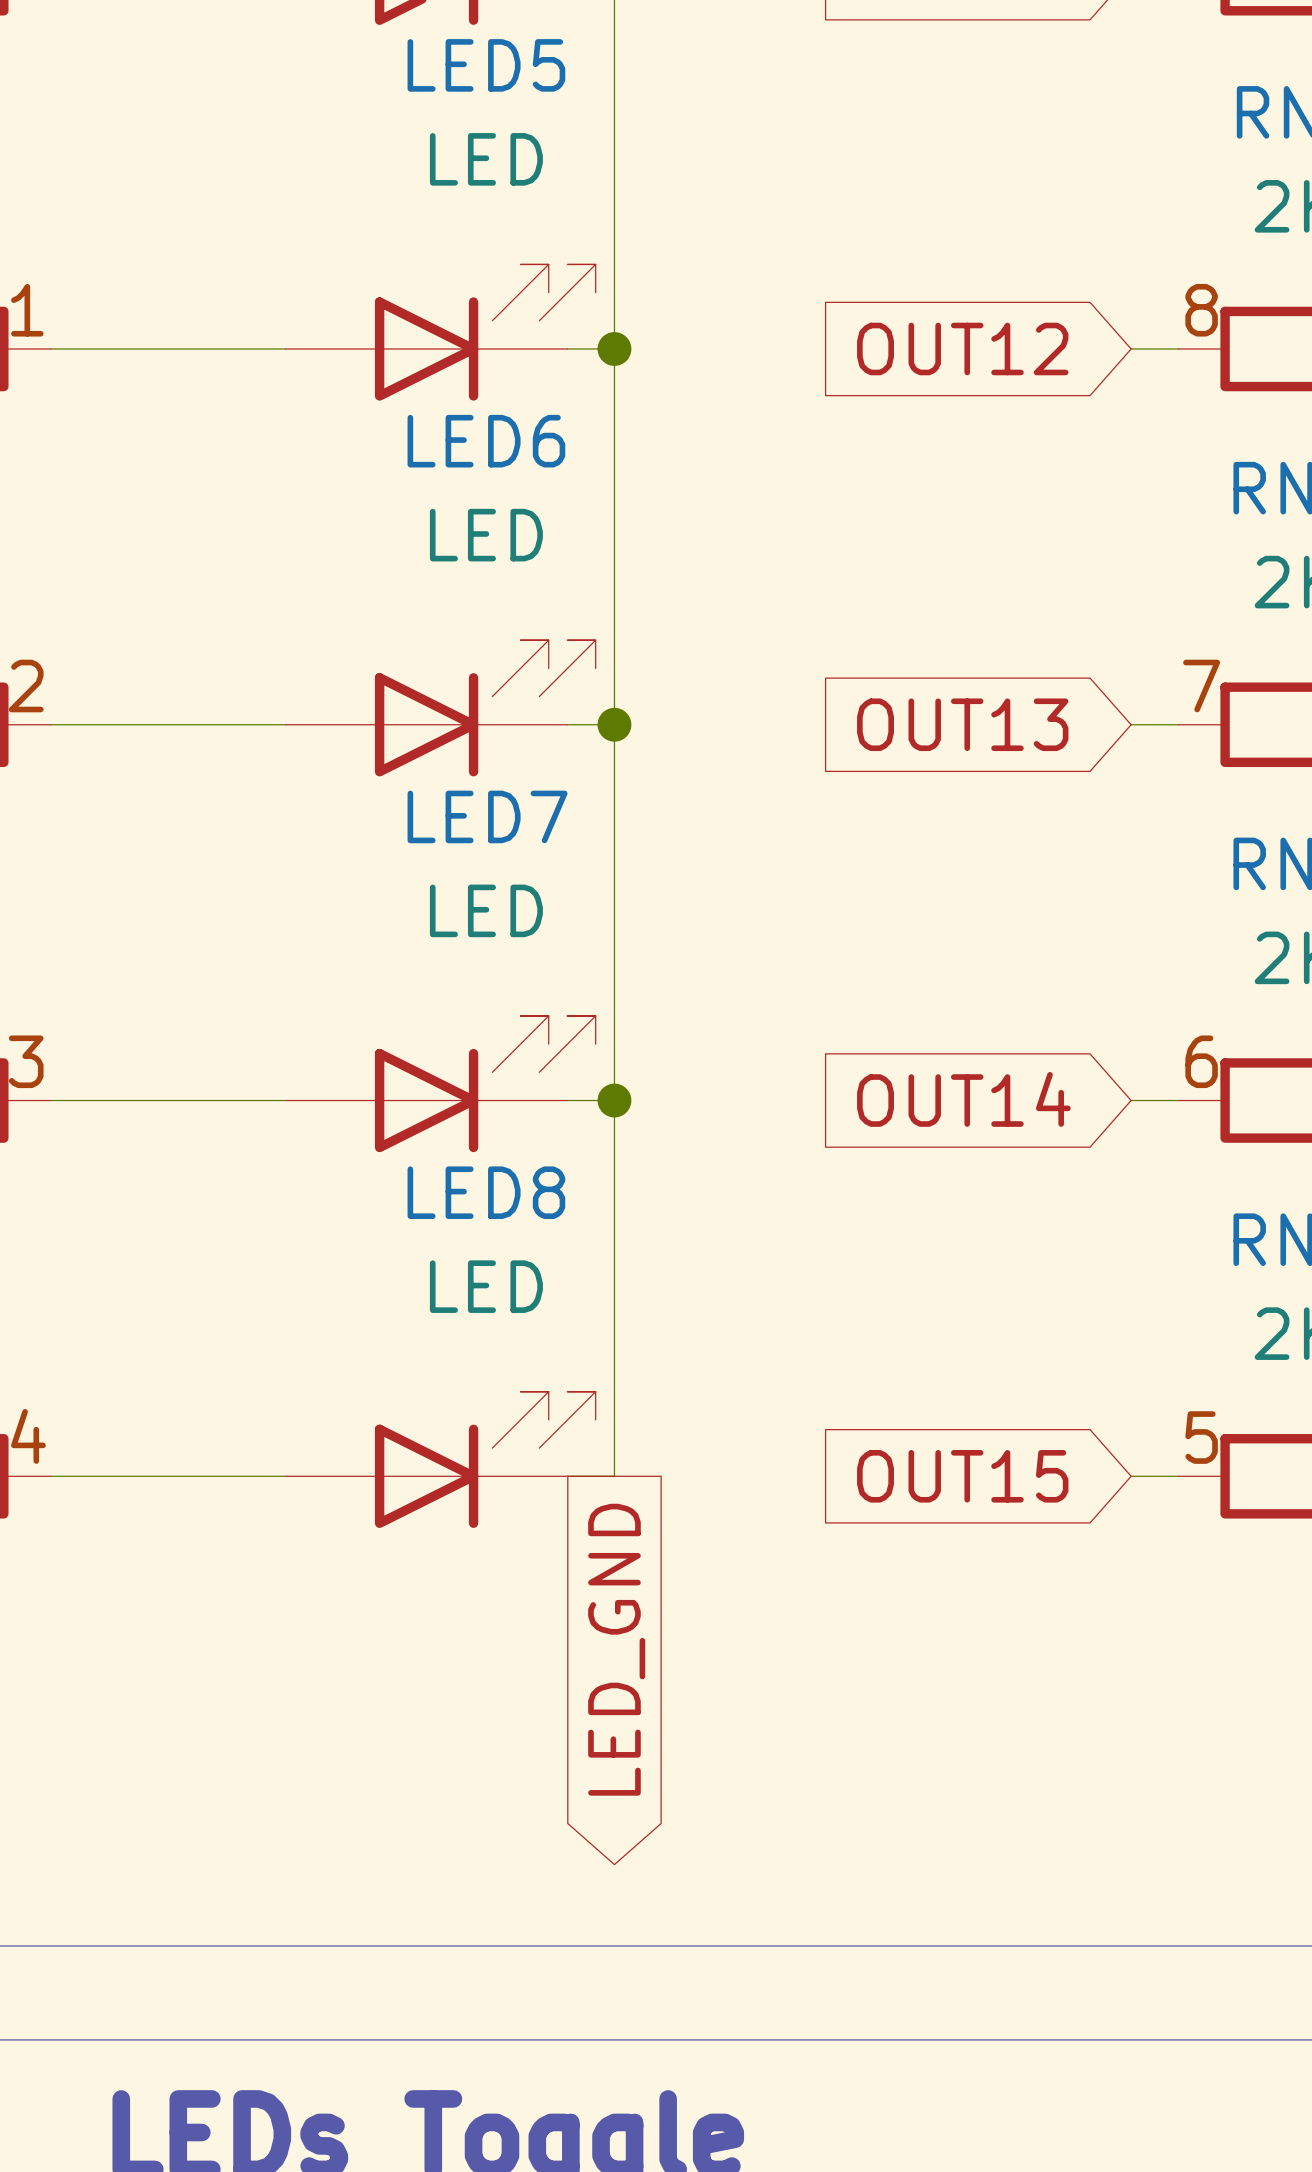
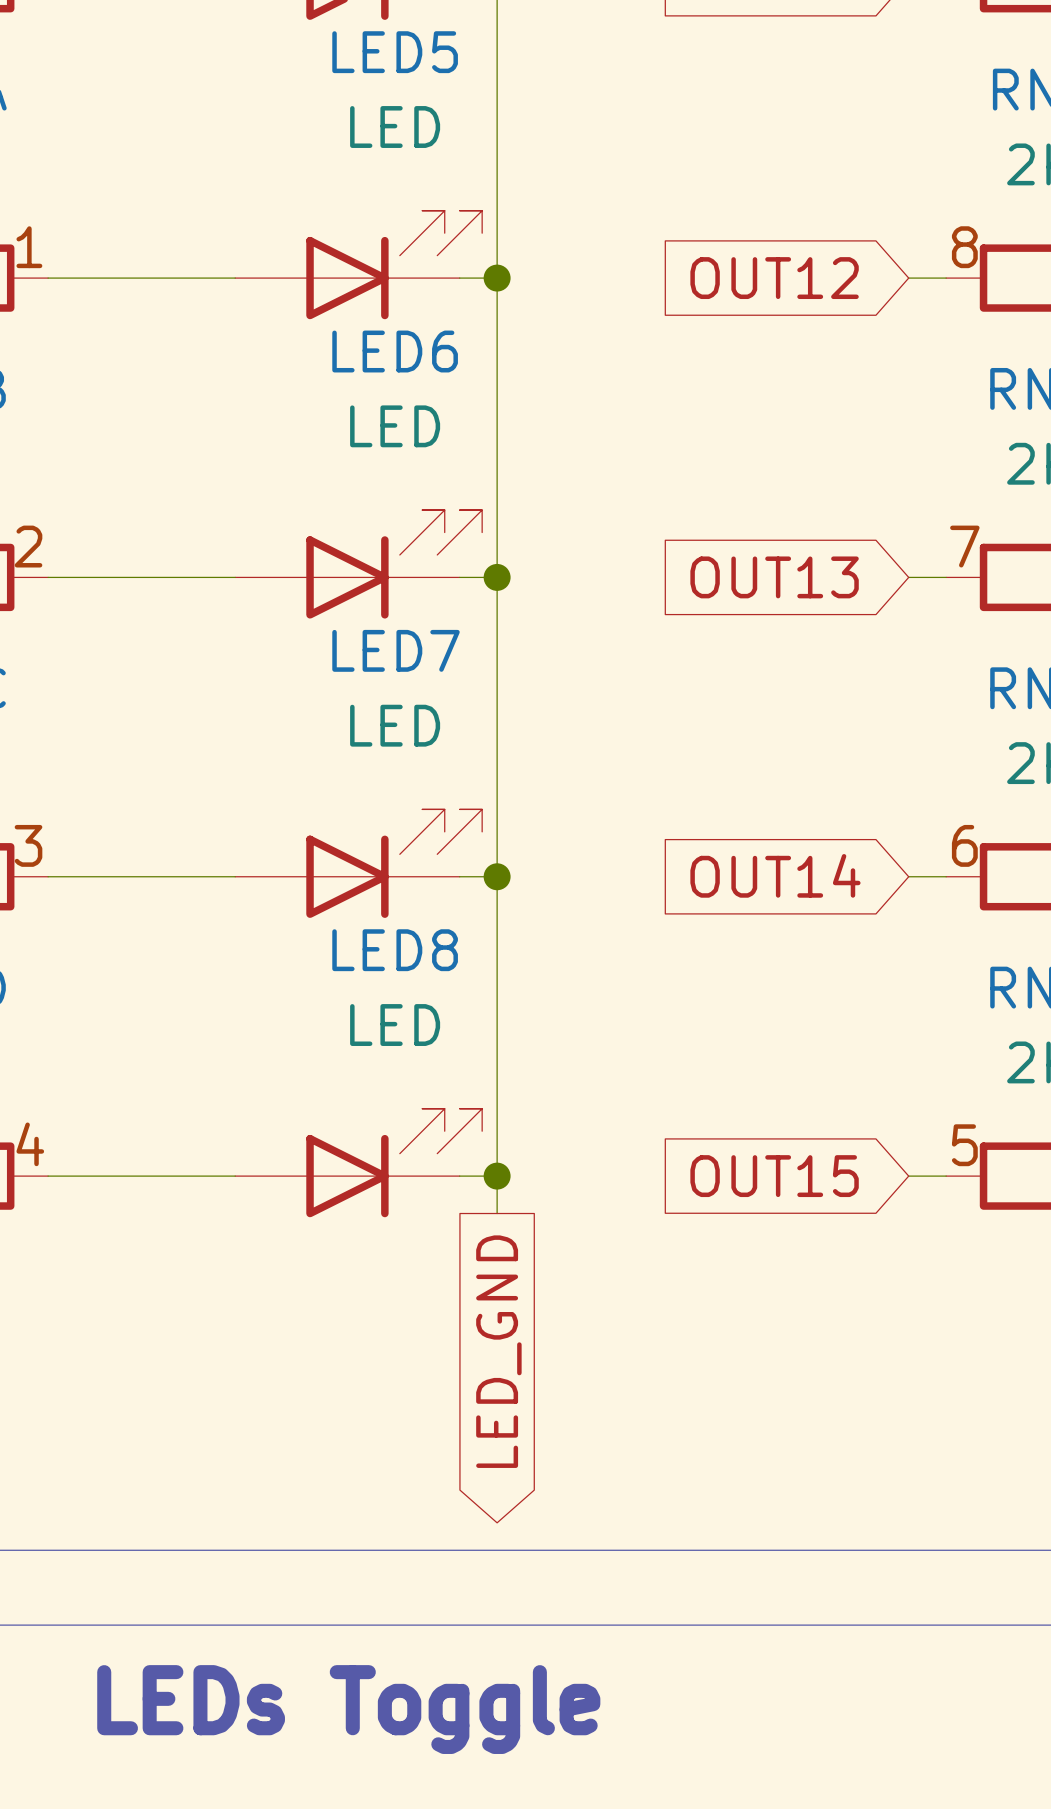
wire: none -> (497, 1176) (497, 1213)
junction: none -> (497, 1176)
global label position: LED_GND (616, 1649) -> LED_GND (498, 1351)

